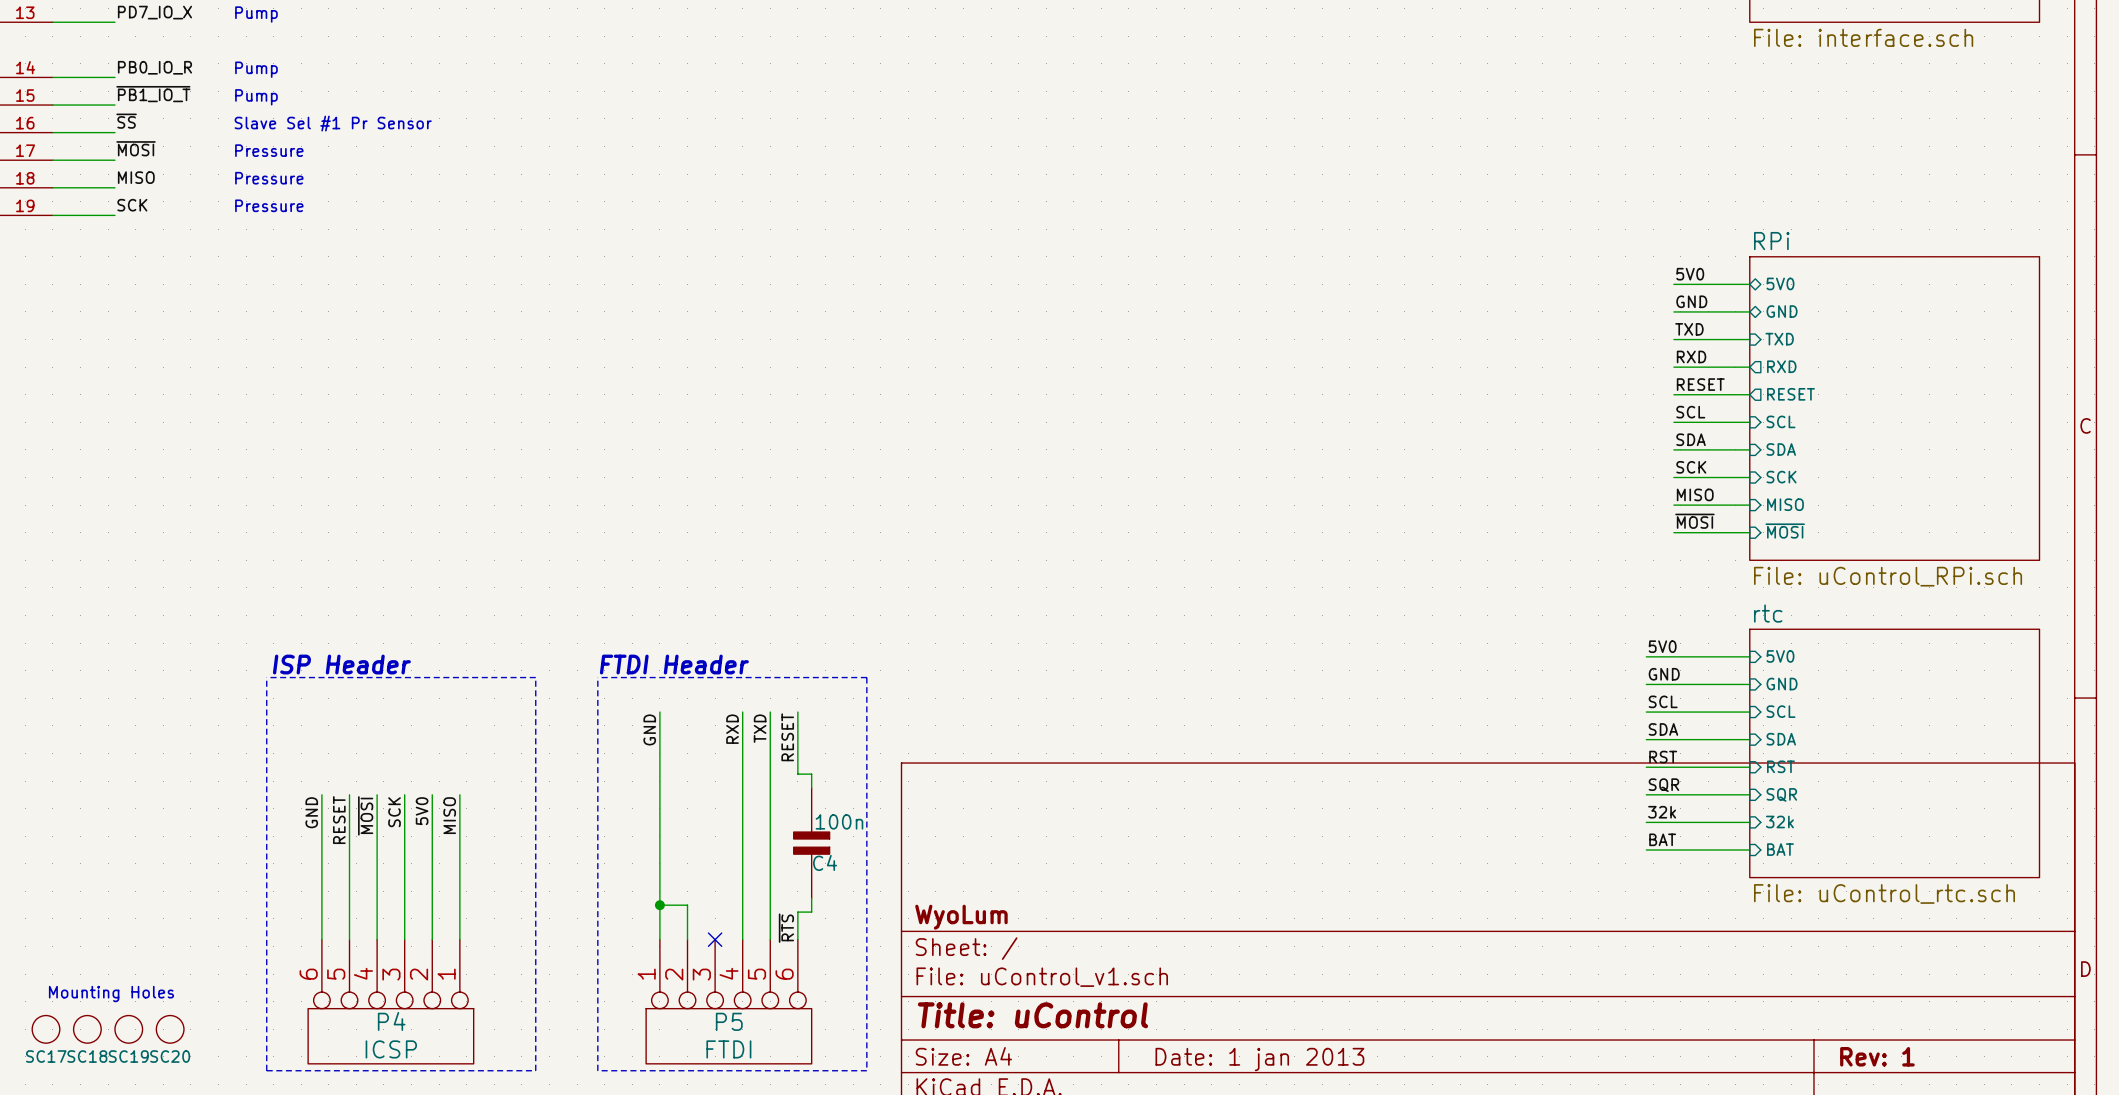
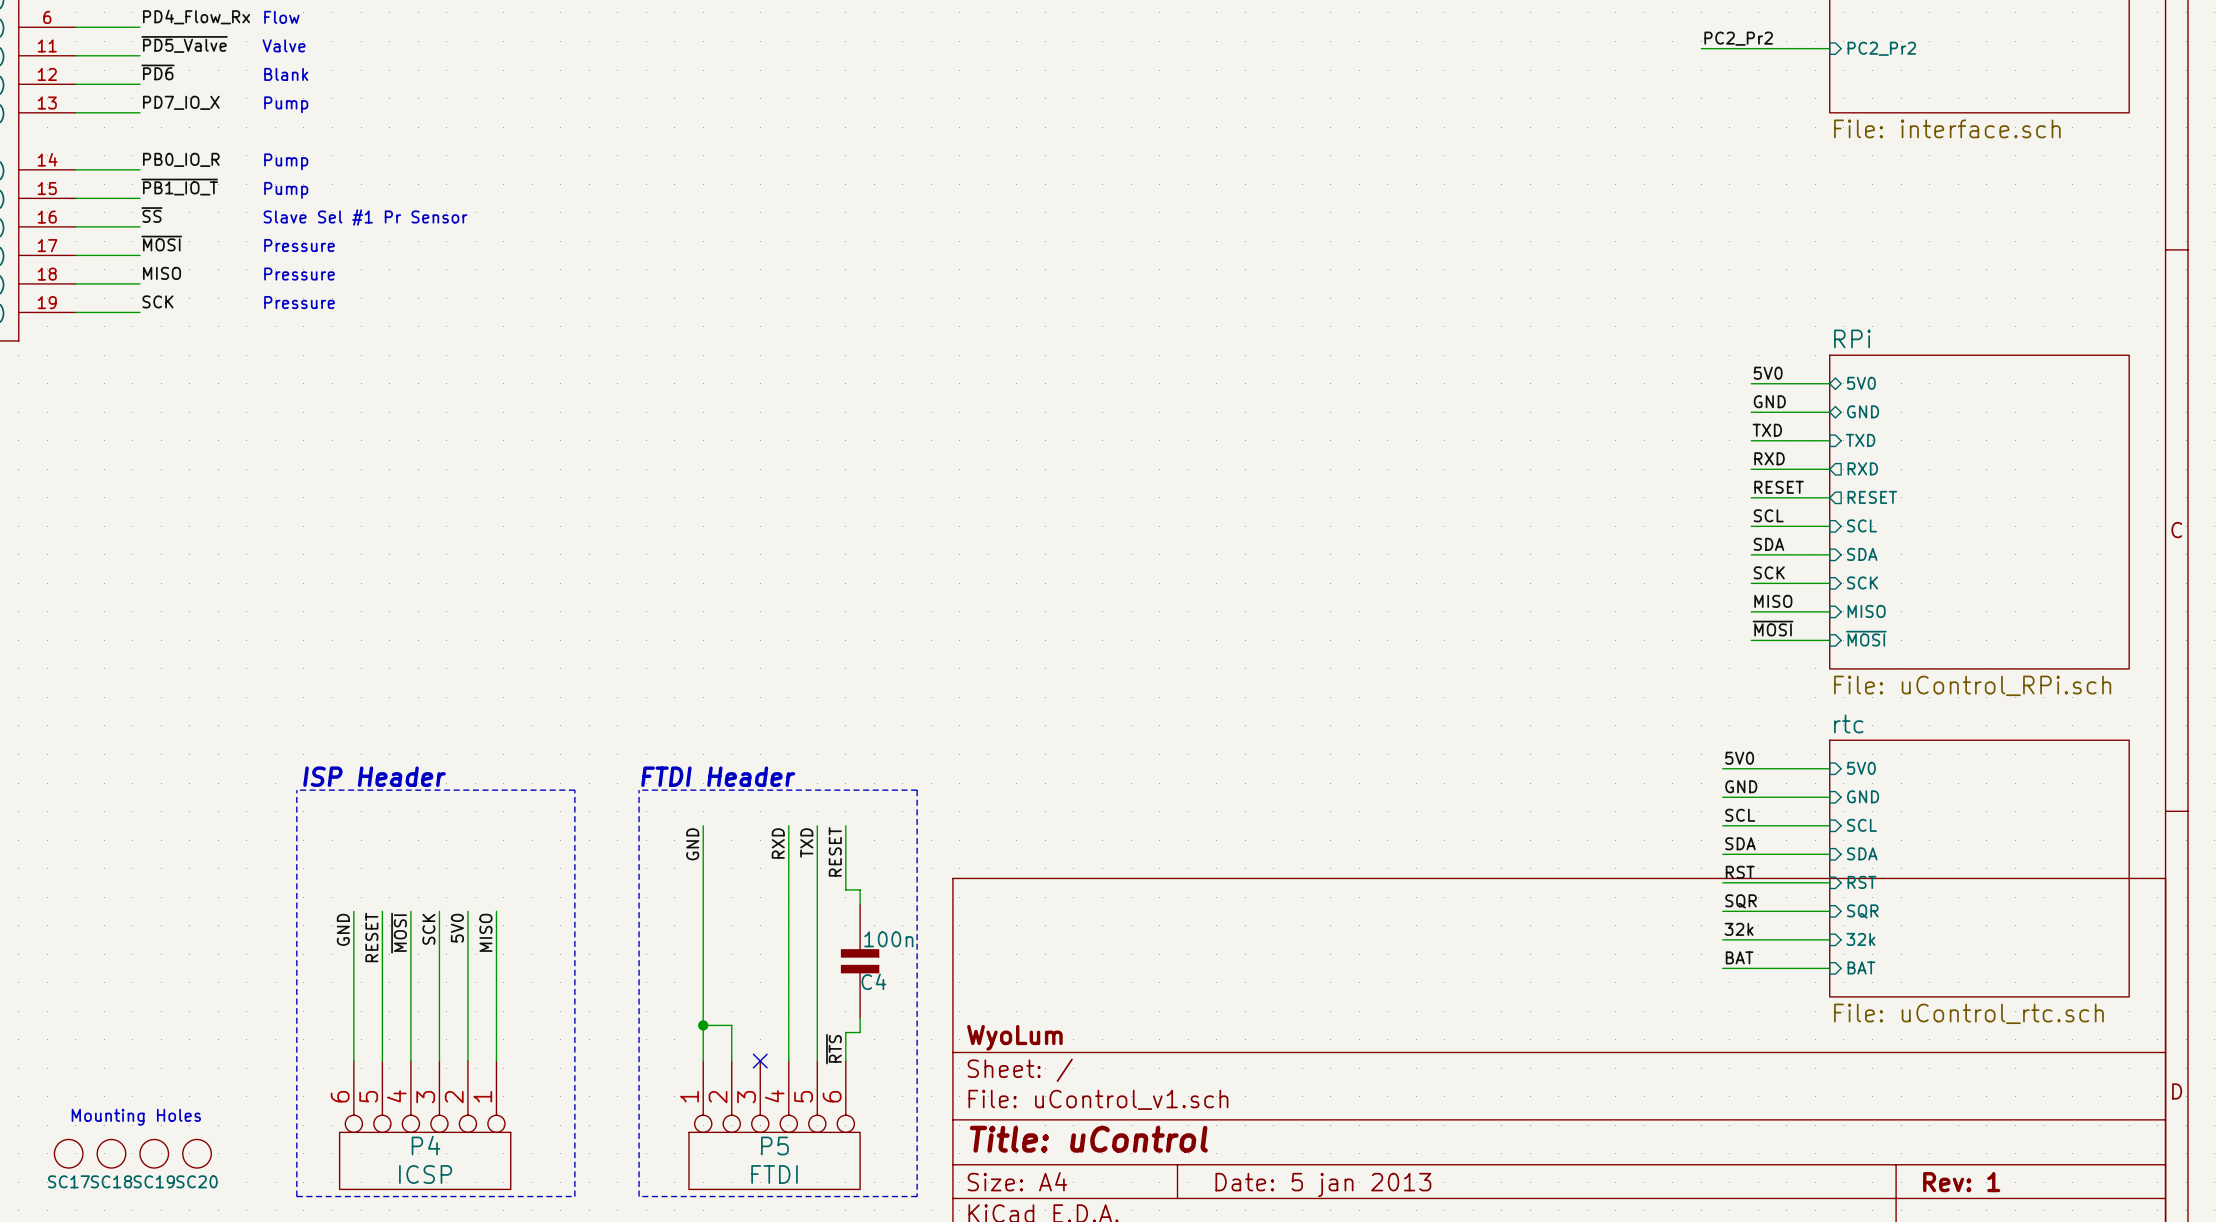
title block: Date: 1 jan 2013 (1259, 1059) -> Date: 5 jan 2013 (1323, 1184)

